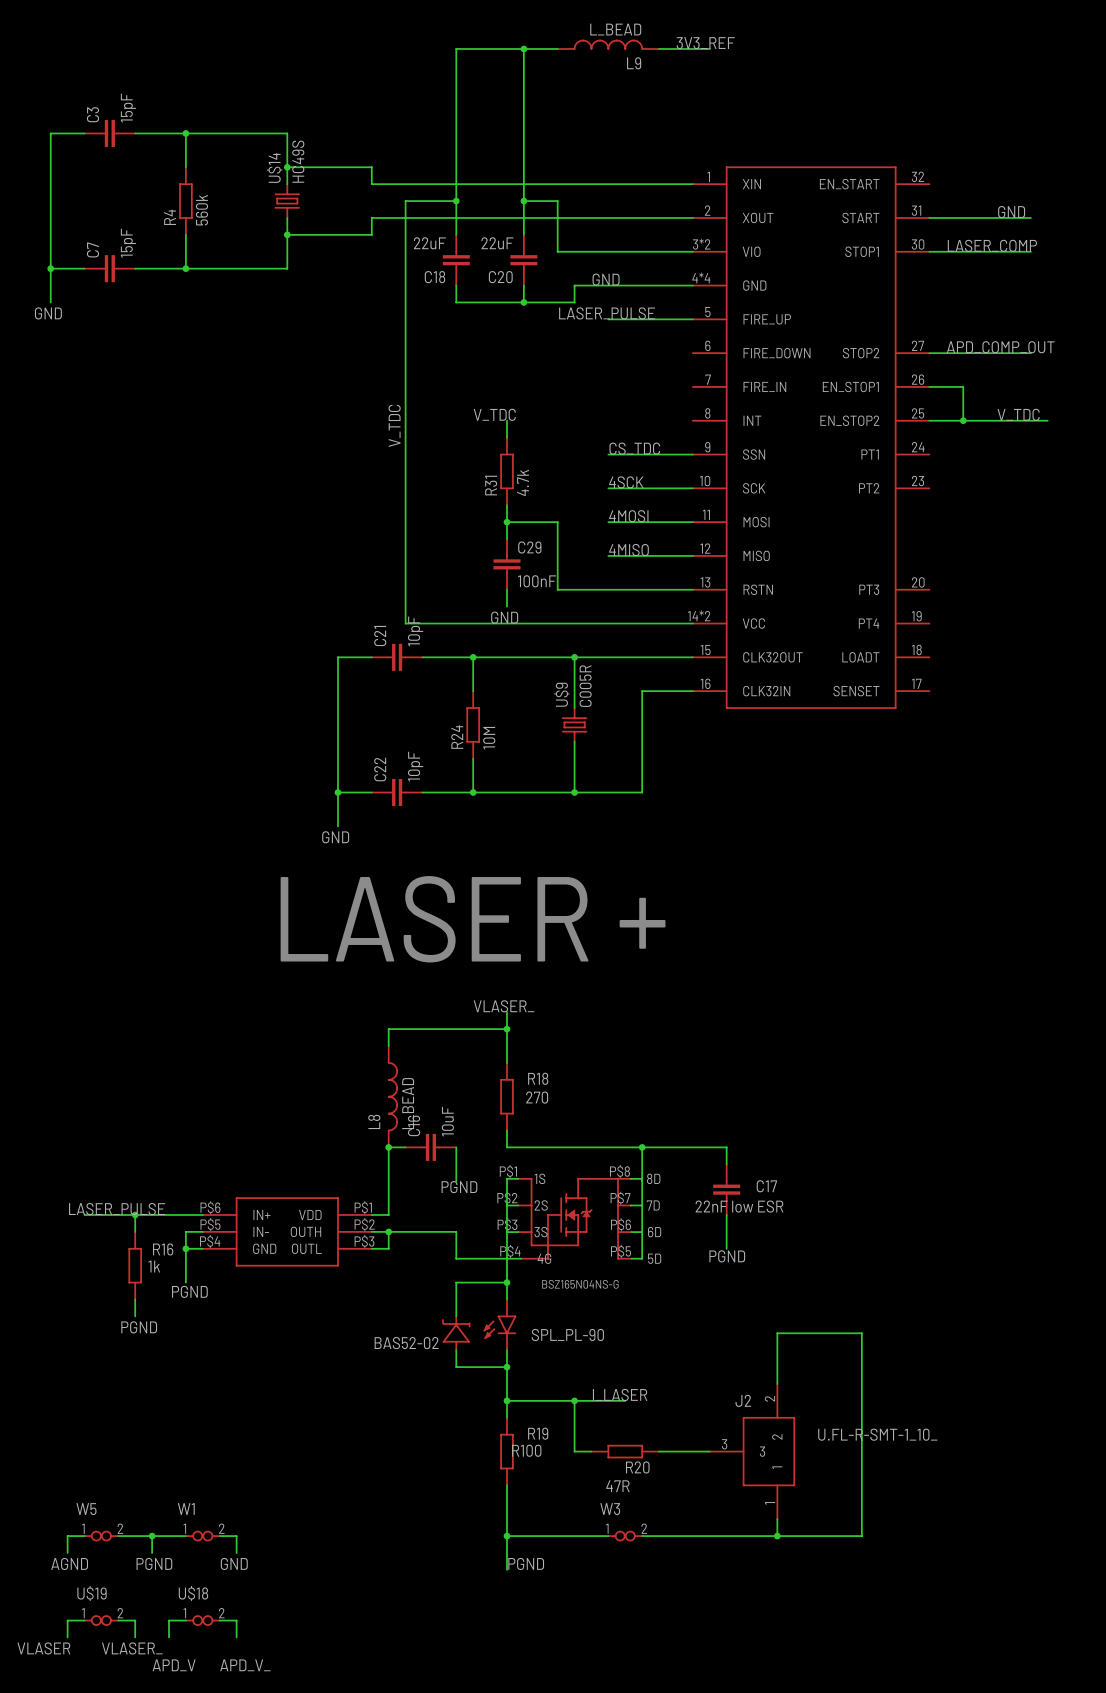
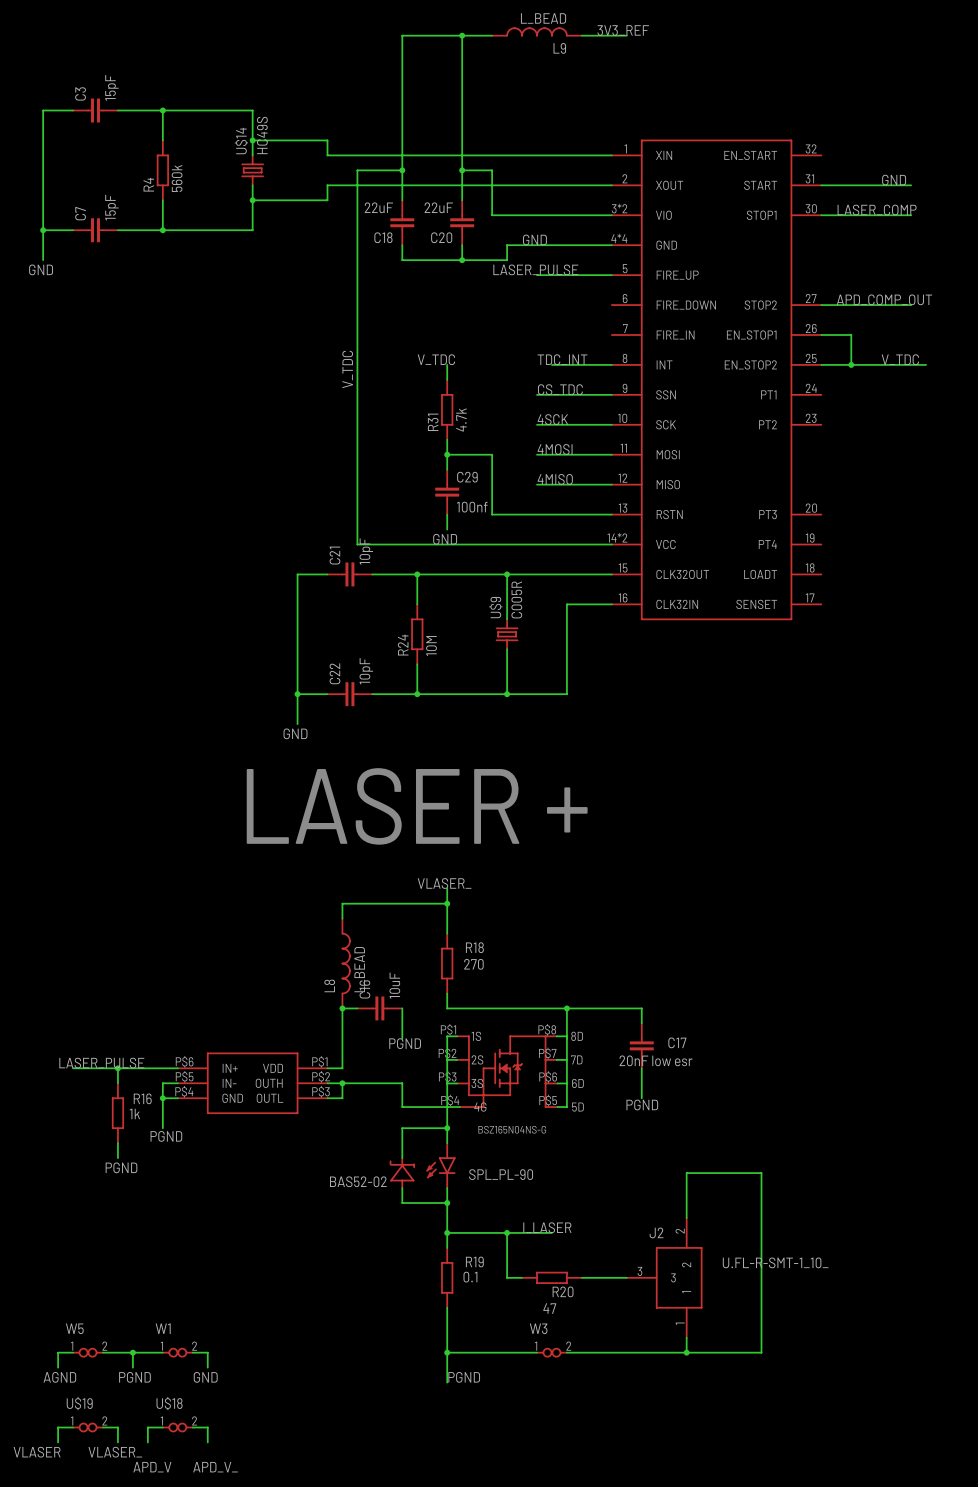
label: none -> TDC_INT (562, 359)
wire: none -> (551, 364) (611, 364)
C29 value: 100nF (537, 581) -> 100nf (472, 507)
C17 value: 22nF low ESR (739, 1206) -> 20nF low esr (656, 1060)
R19 value: R100 (526, 1450) -> 0.1 (470, 1277)
R20 value: 47R (617, 1486) -> 47 (549, 1308)

